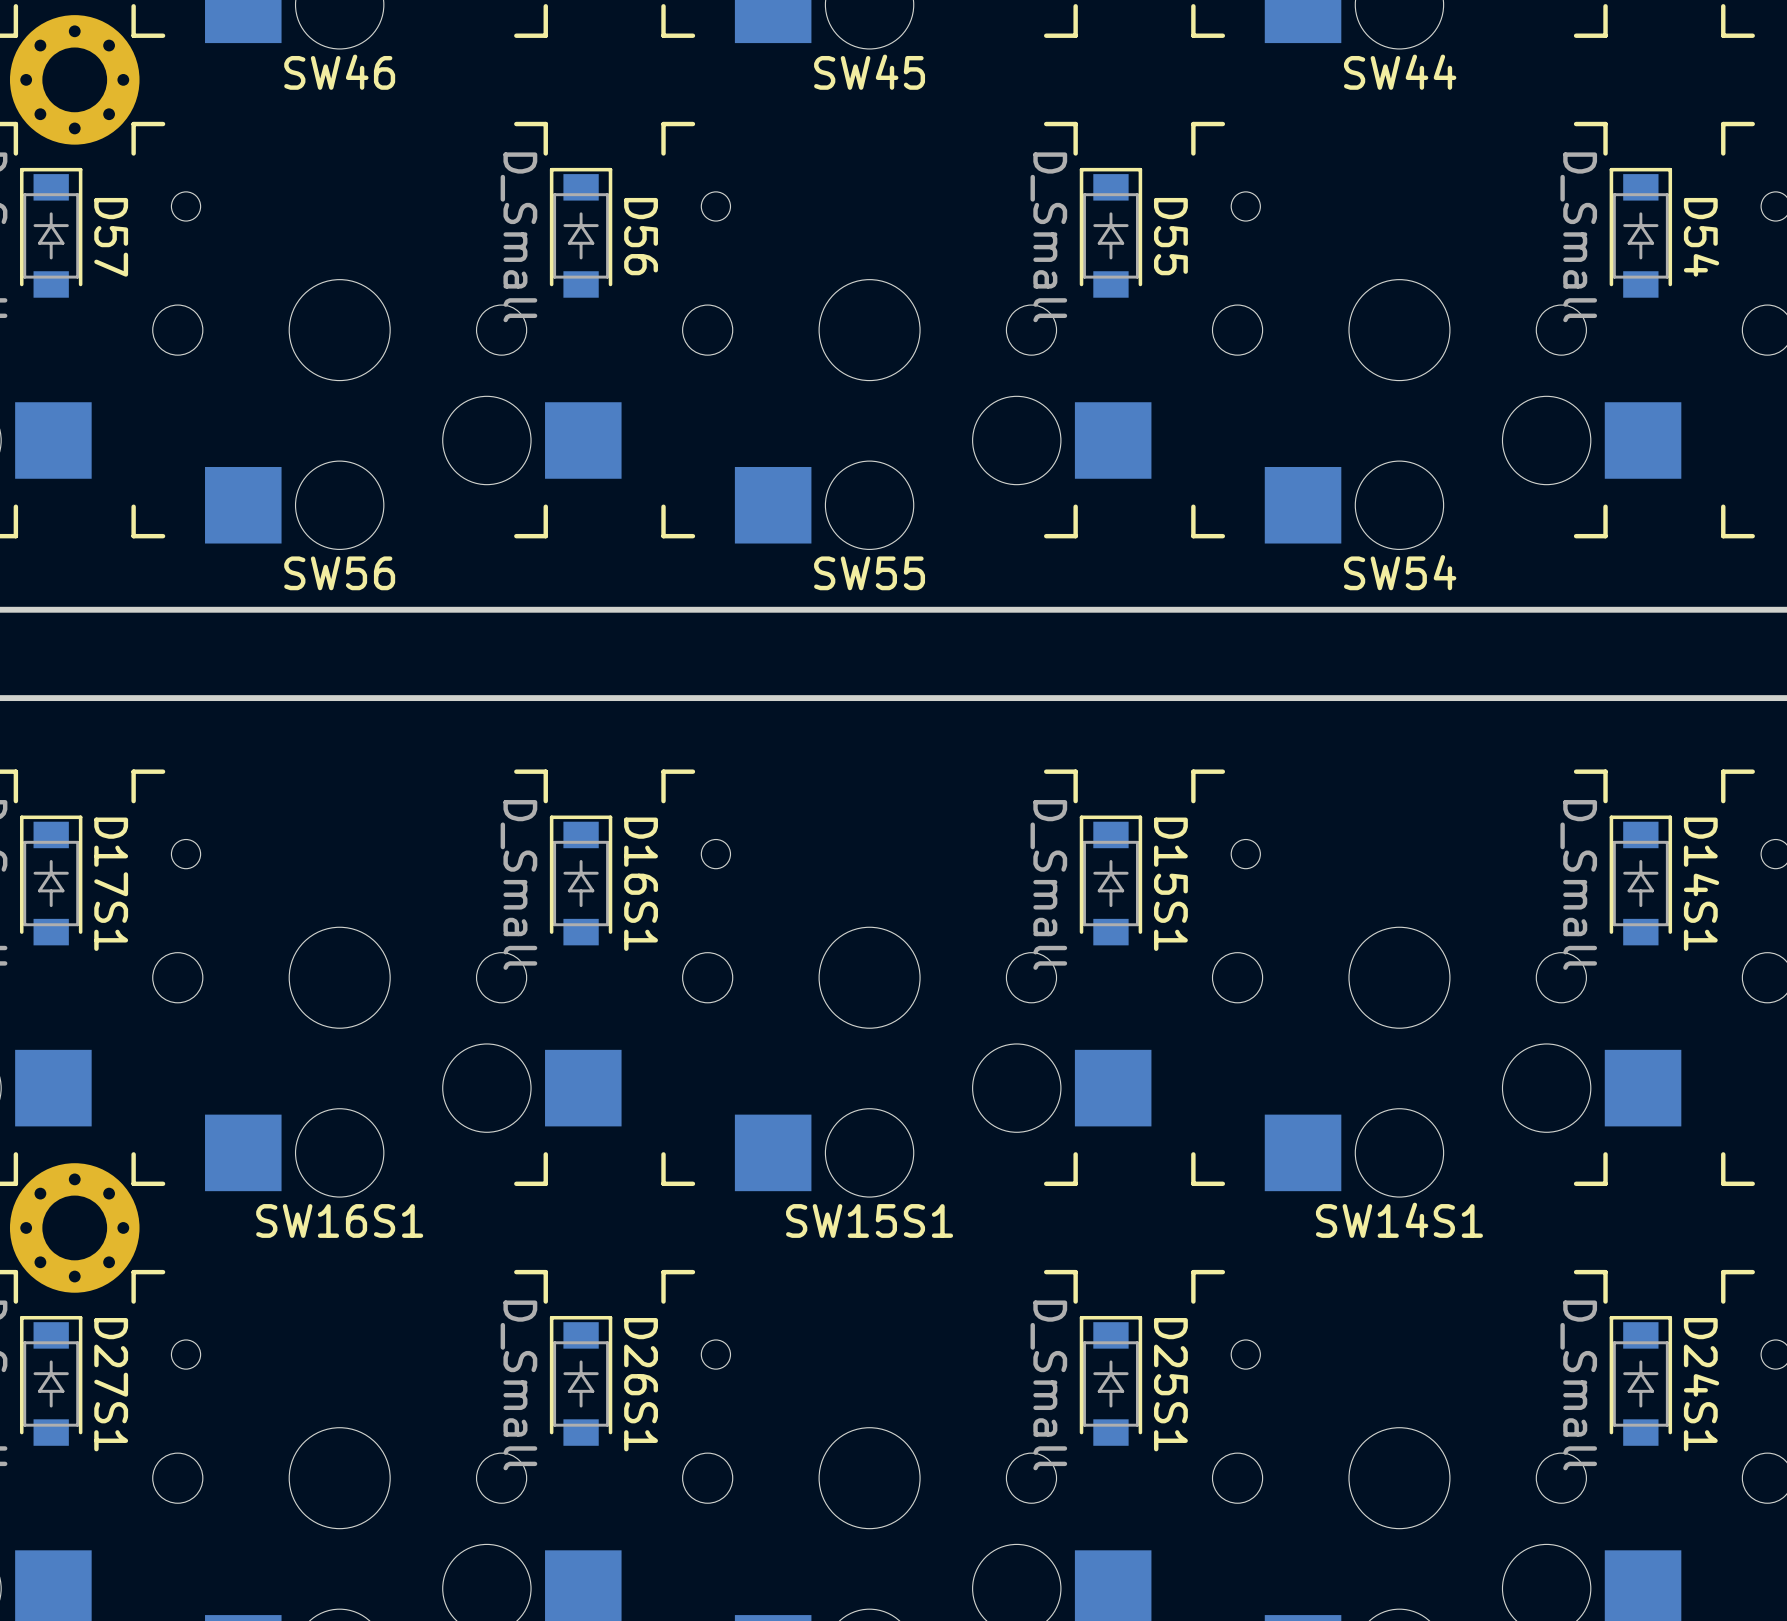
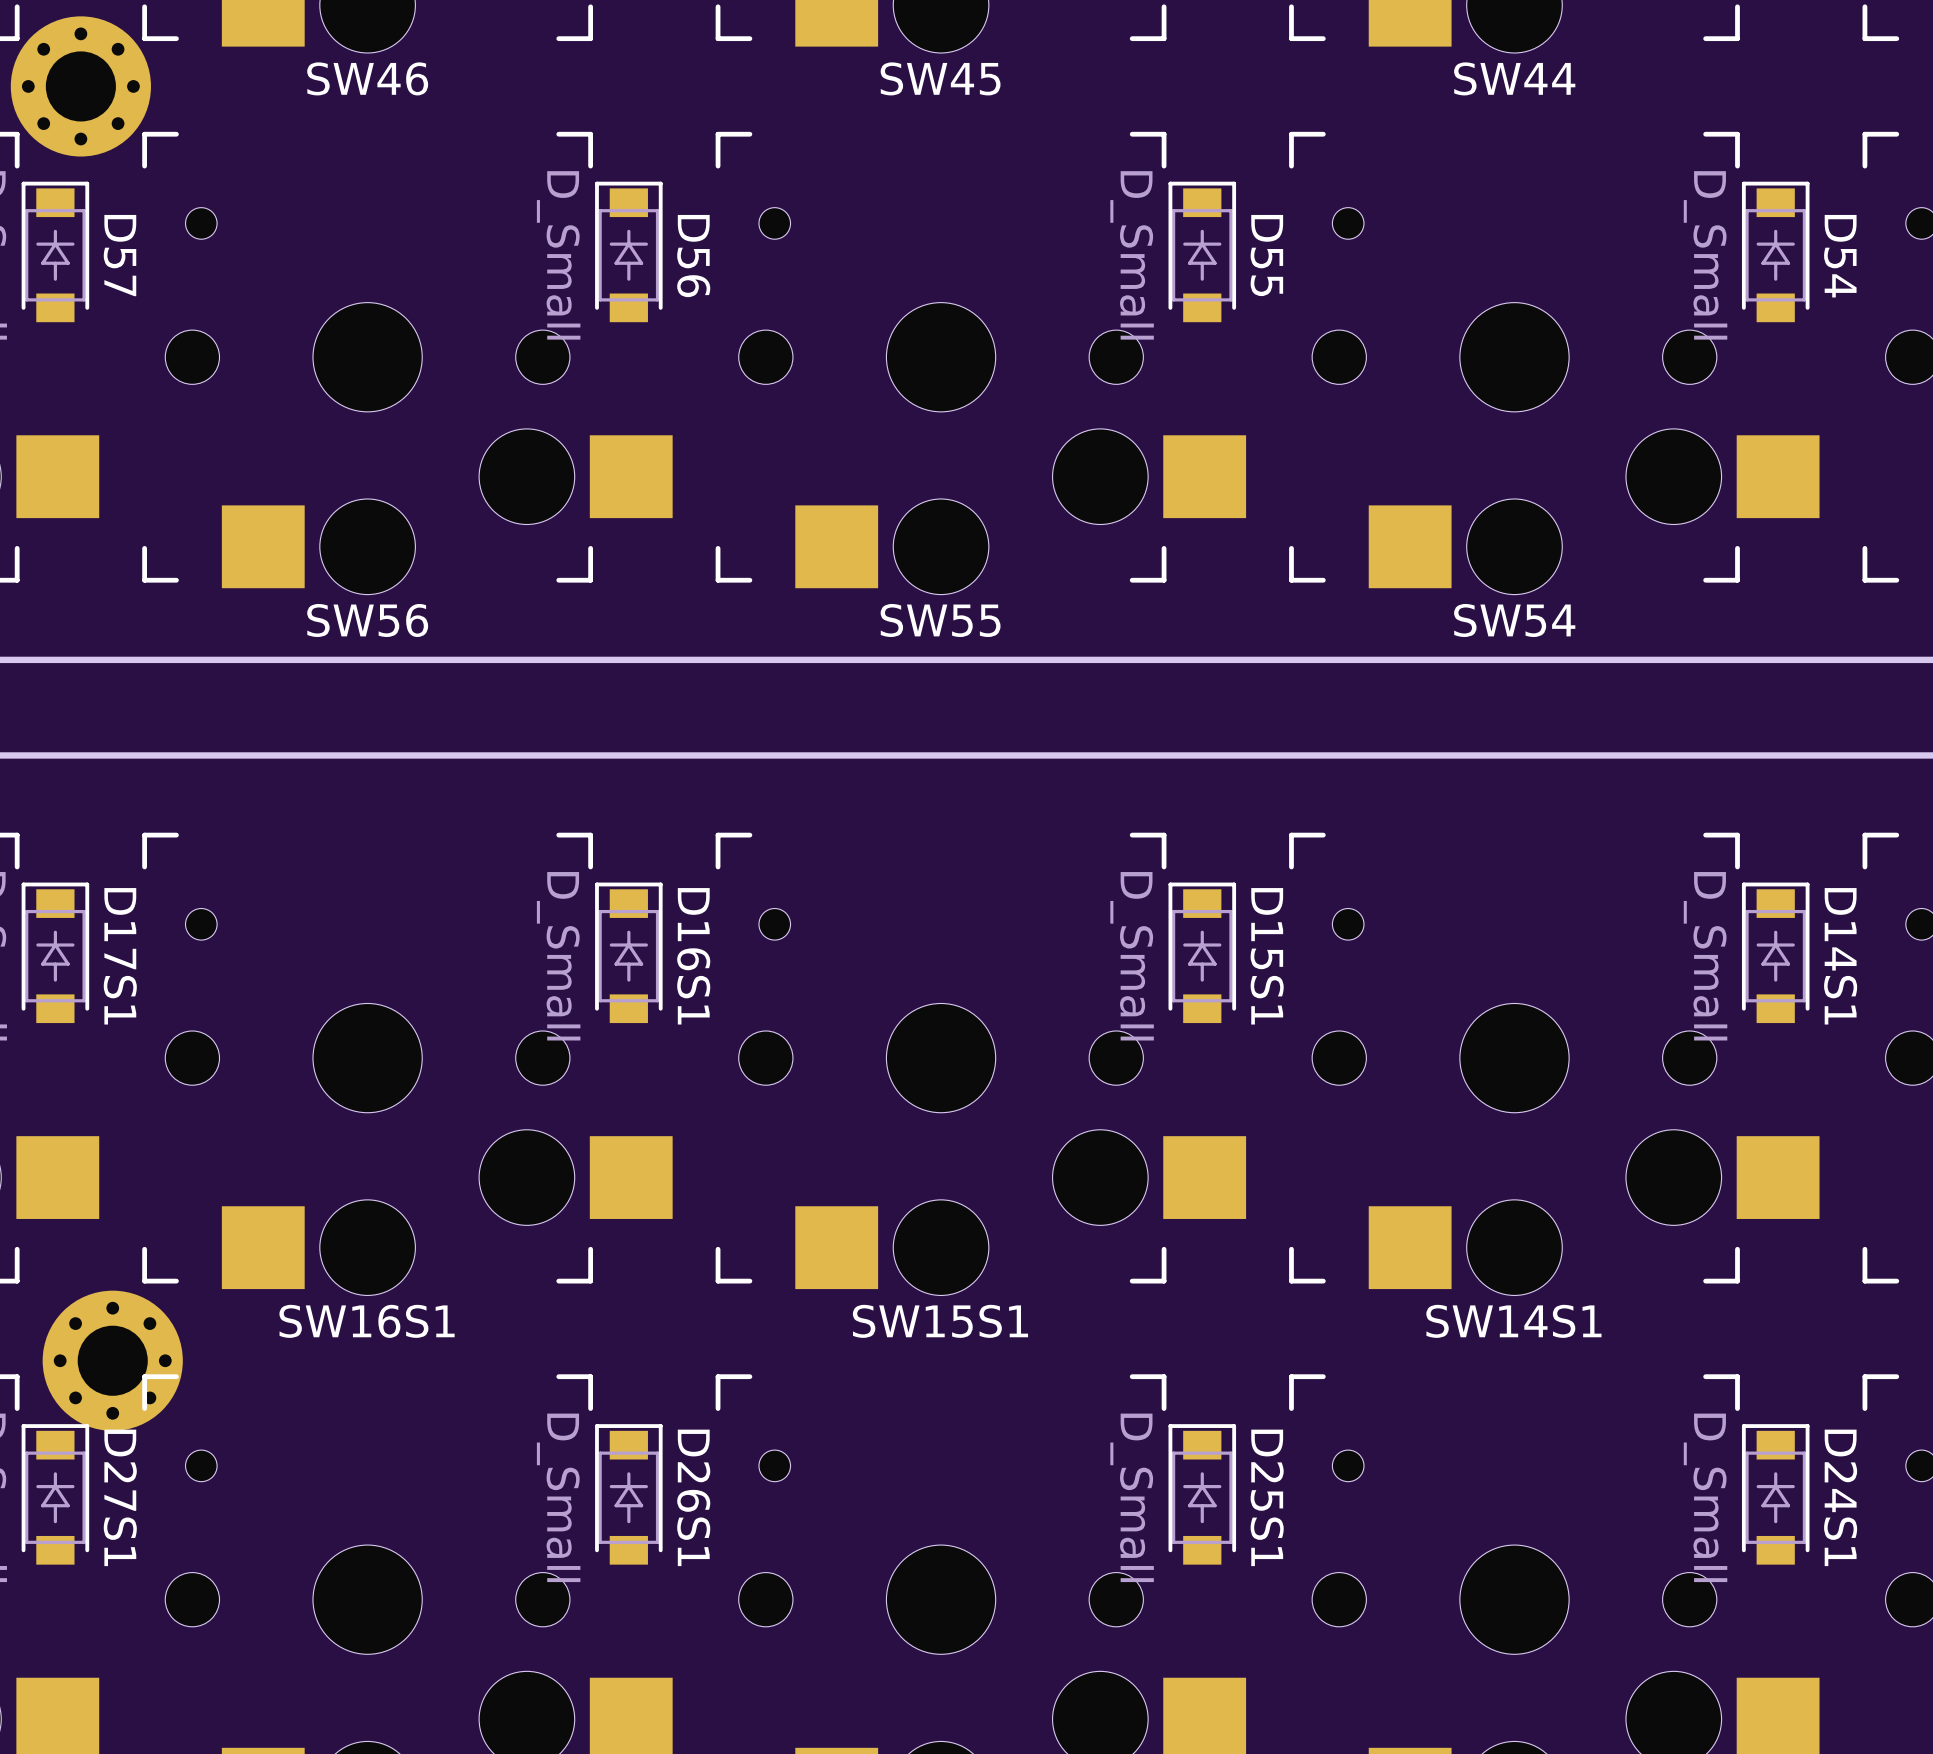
part position: (74, 1227) -> (112, 1360)

